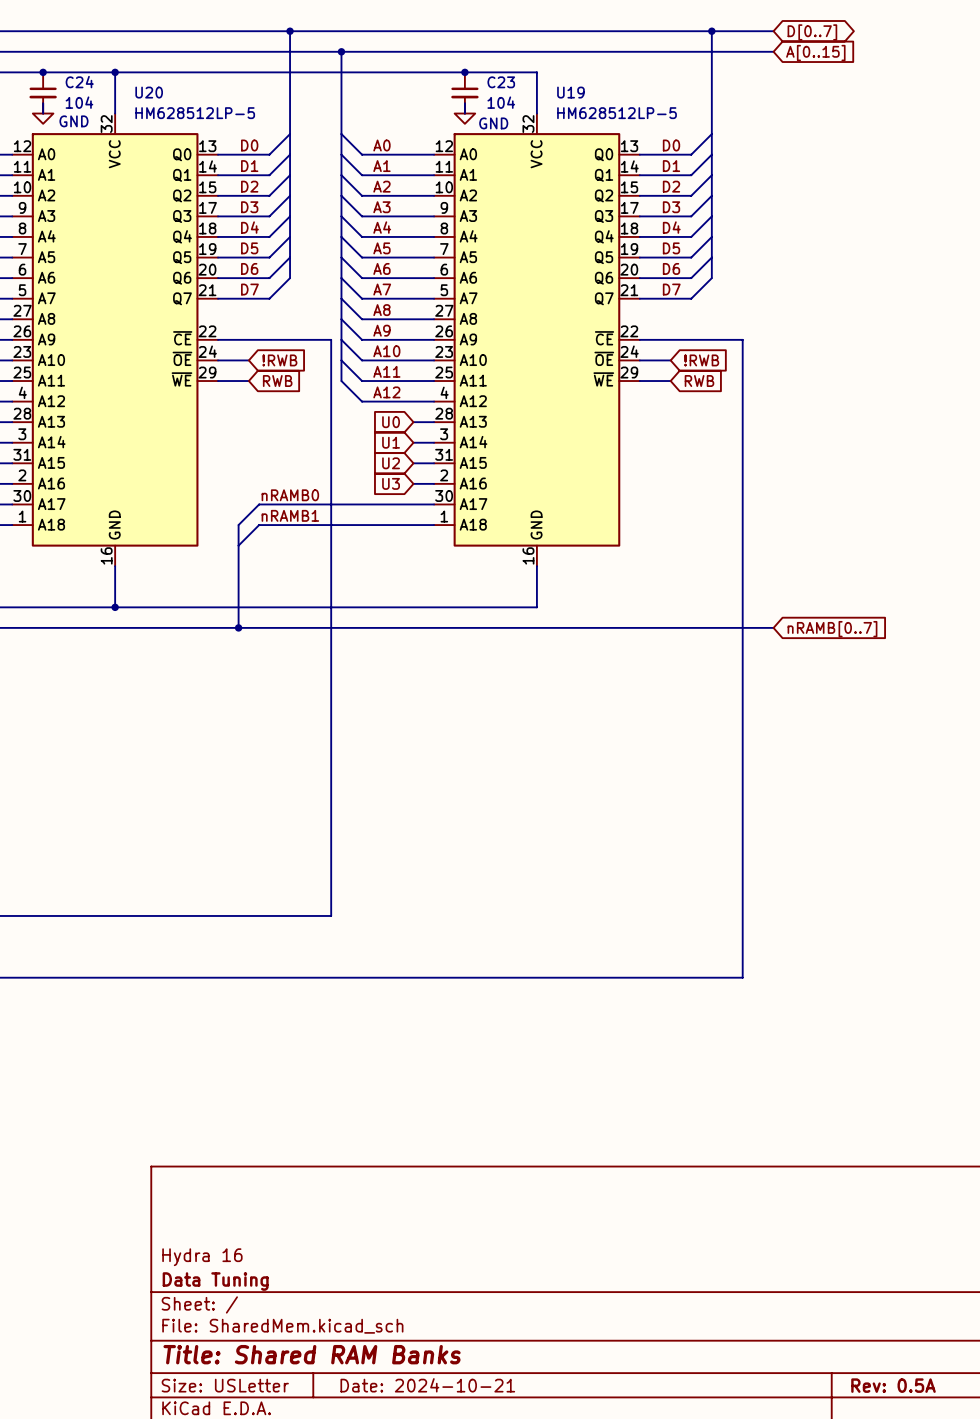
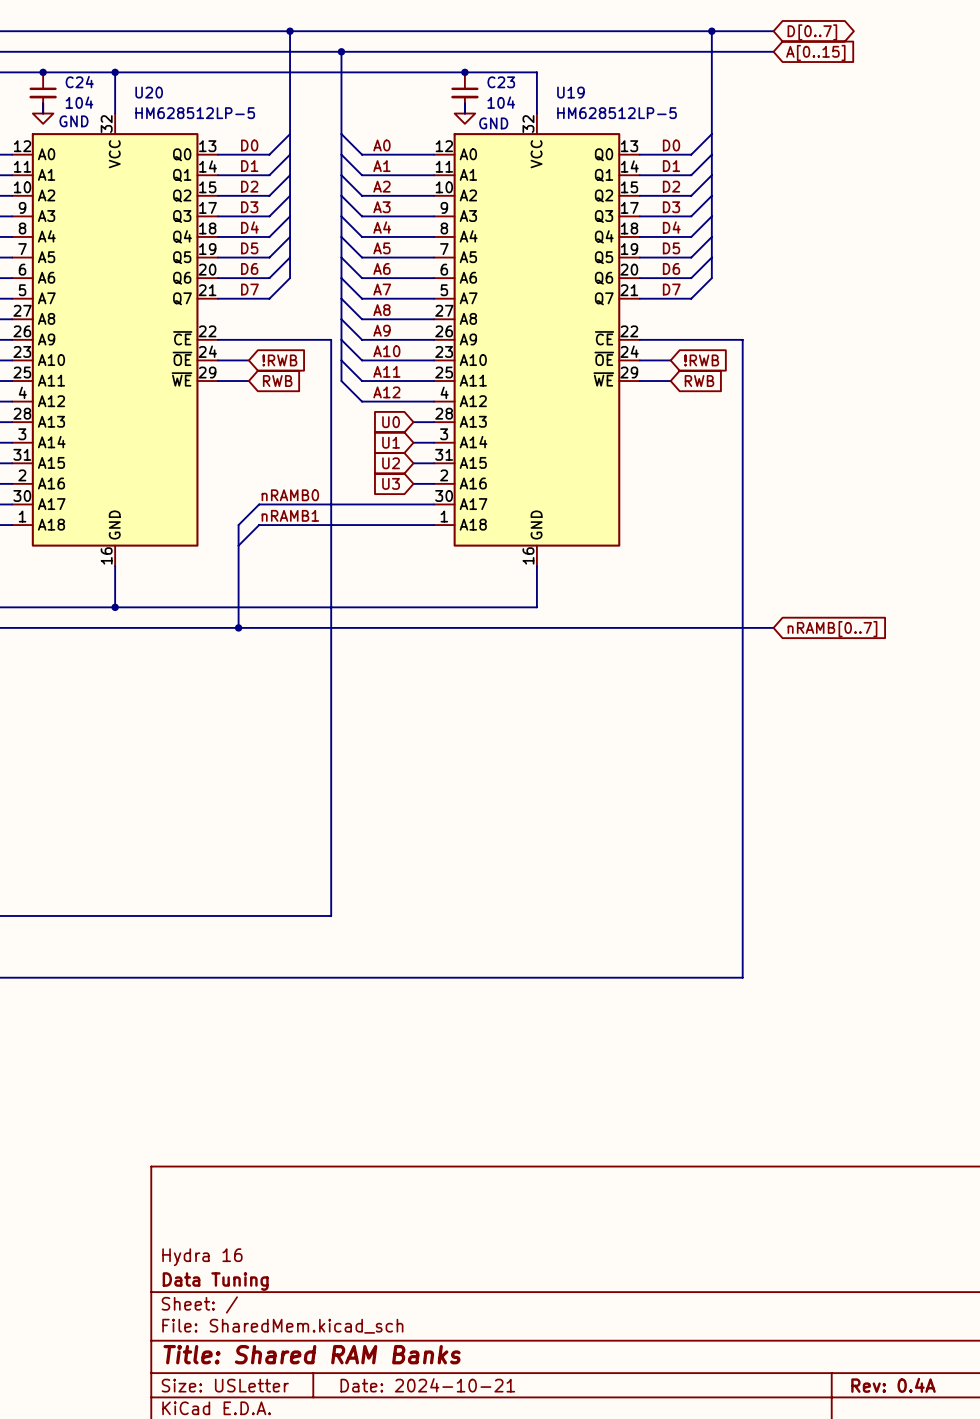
title block: Rev: 0.5A (893, 1385) -> Rev: 0.4A (893, 1385)

